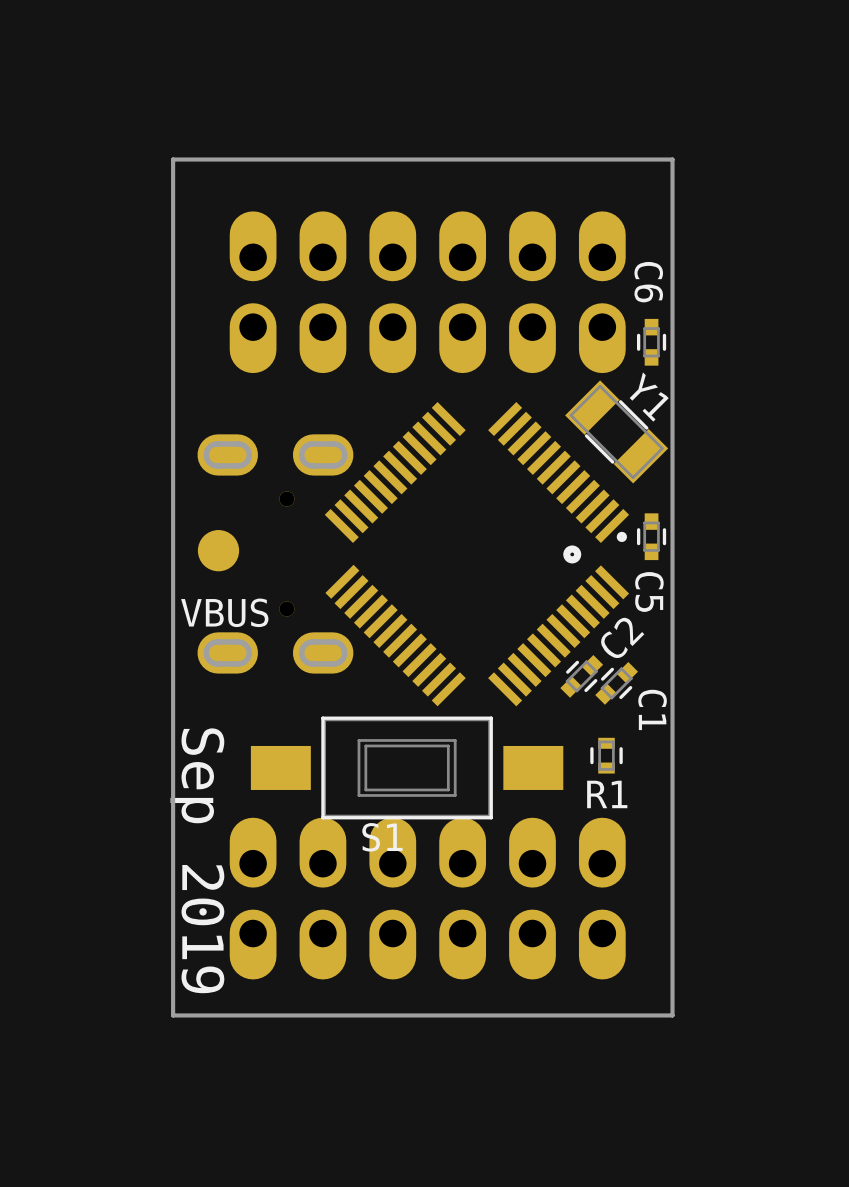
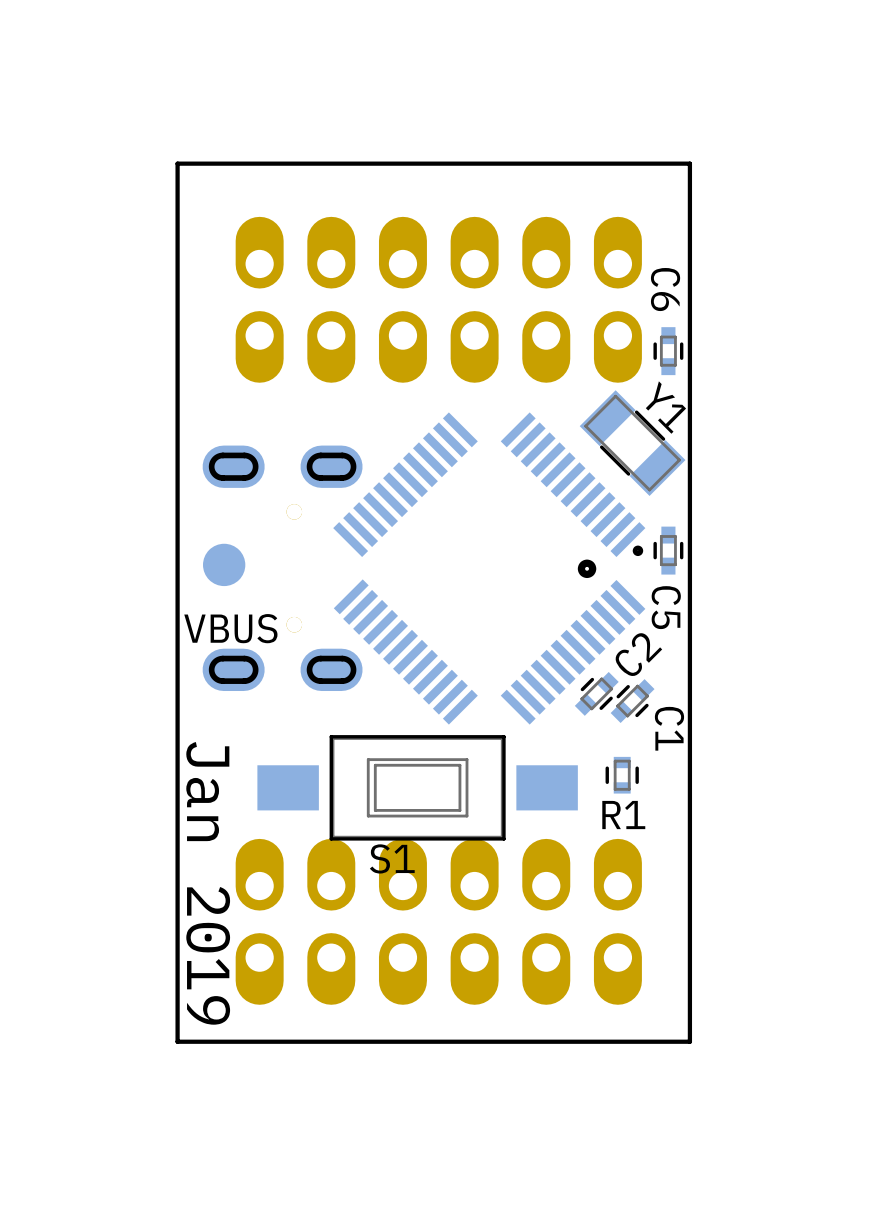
text: Sep 2019 (197, 860) -> Jan 2019 (208, 883)

